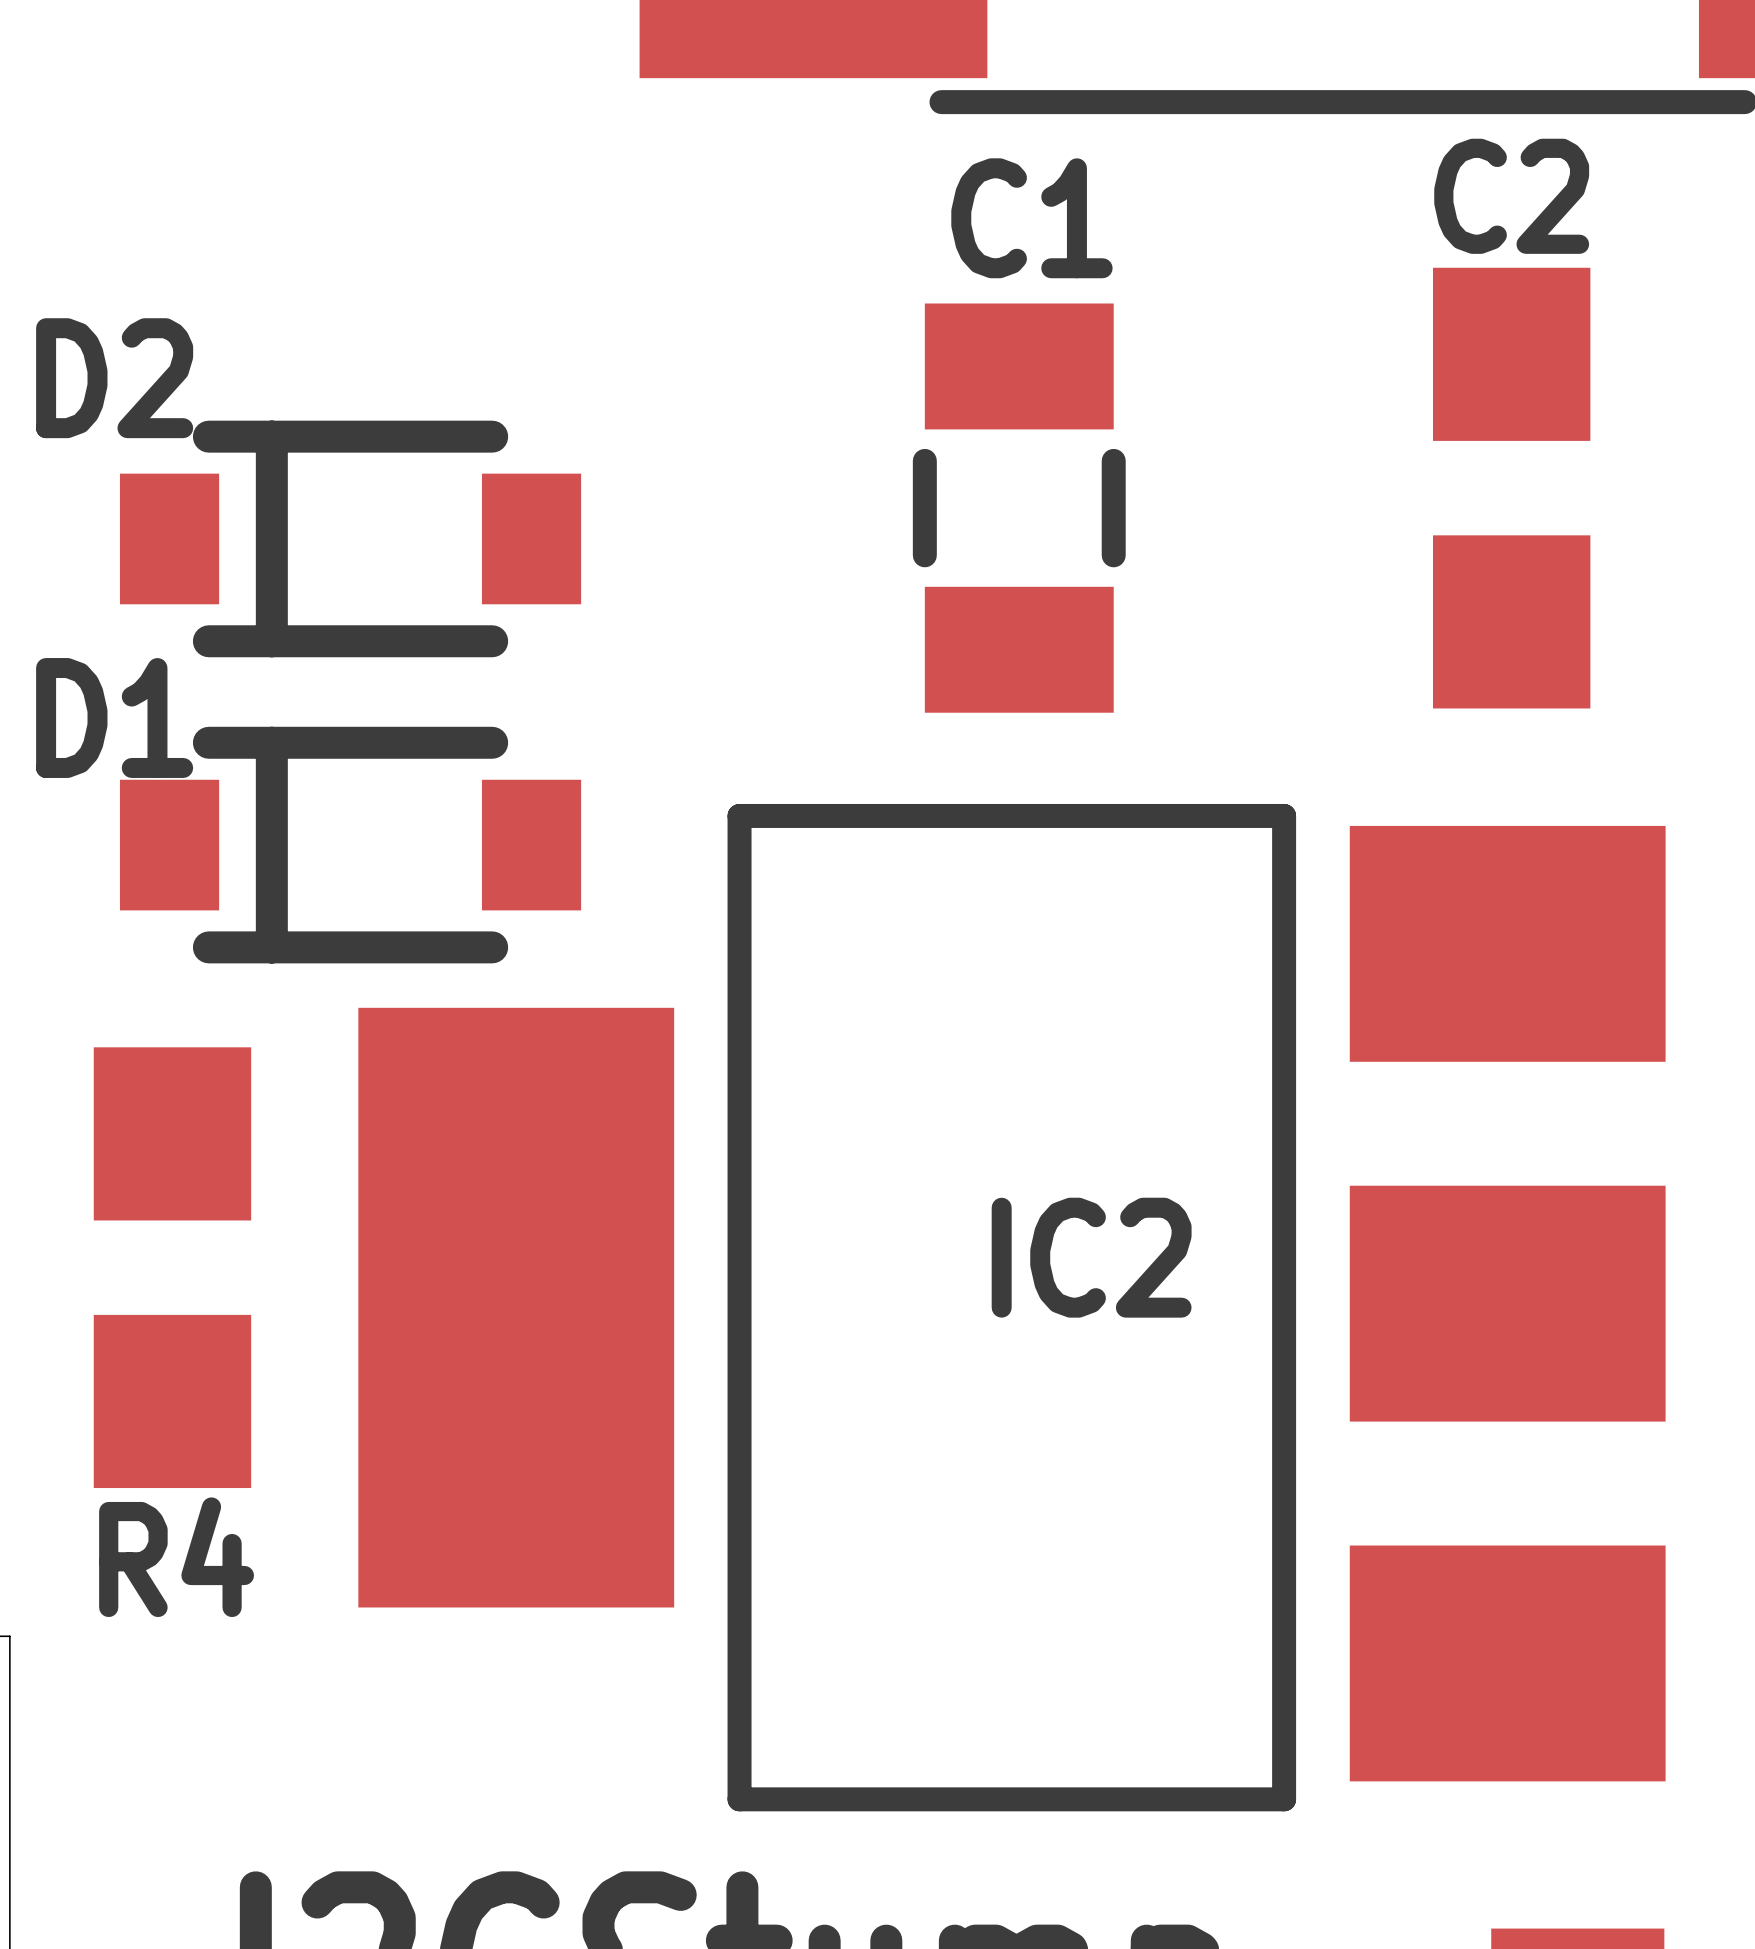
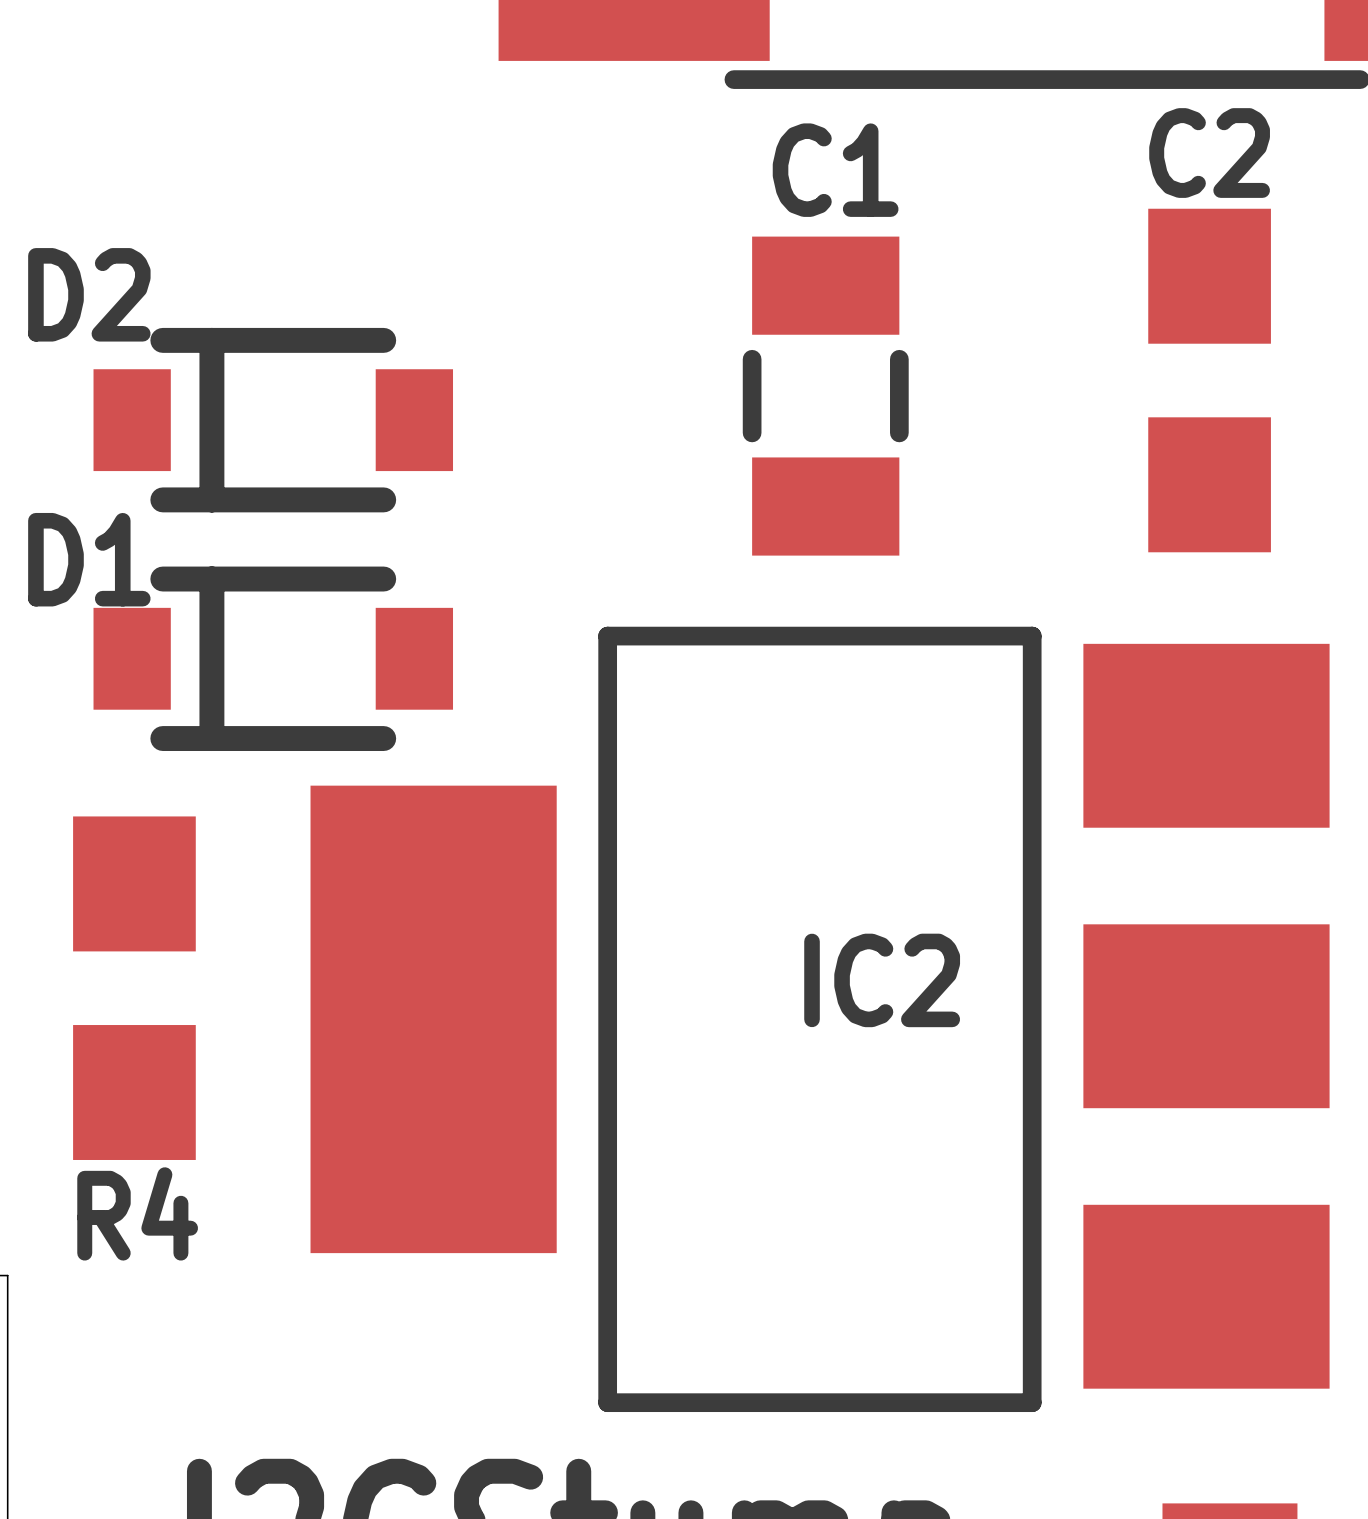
text position: C1 (1031, 218) -> C1 (835, 170)
C2 position: (1511, 488) -> (1209, 380)
part position: (1019, 508) -> (825, 396)
IC2 position: (1011, 1307) -> (820, 1019)

